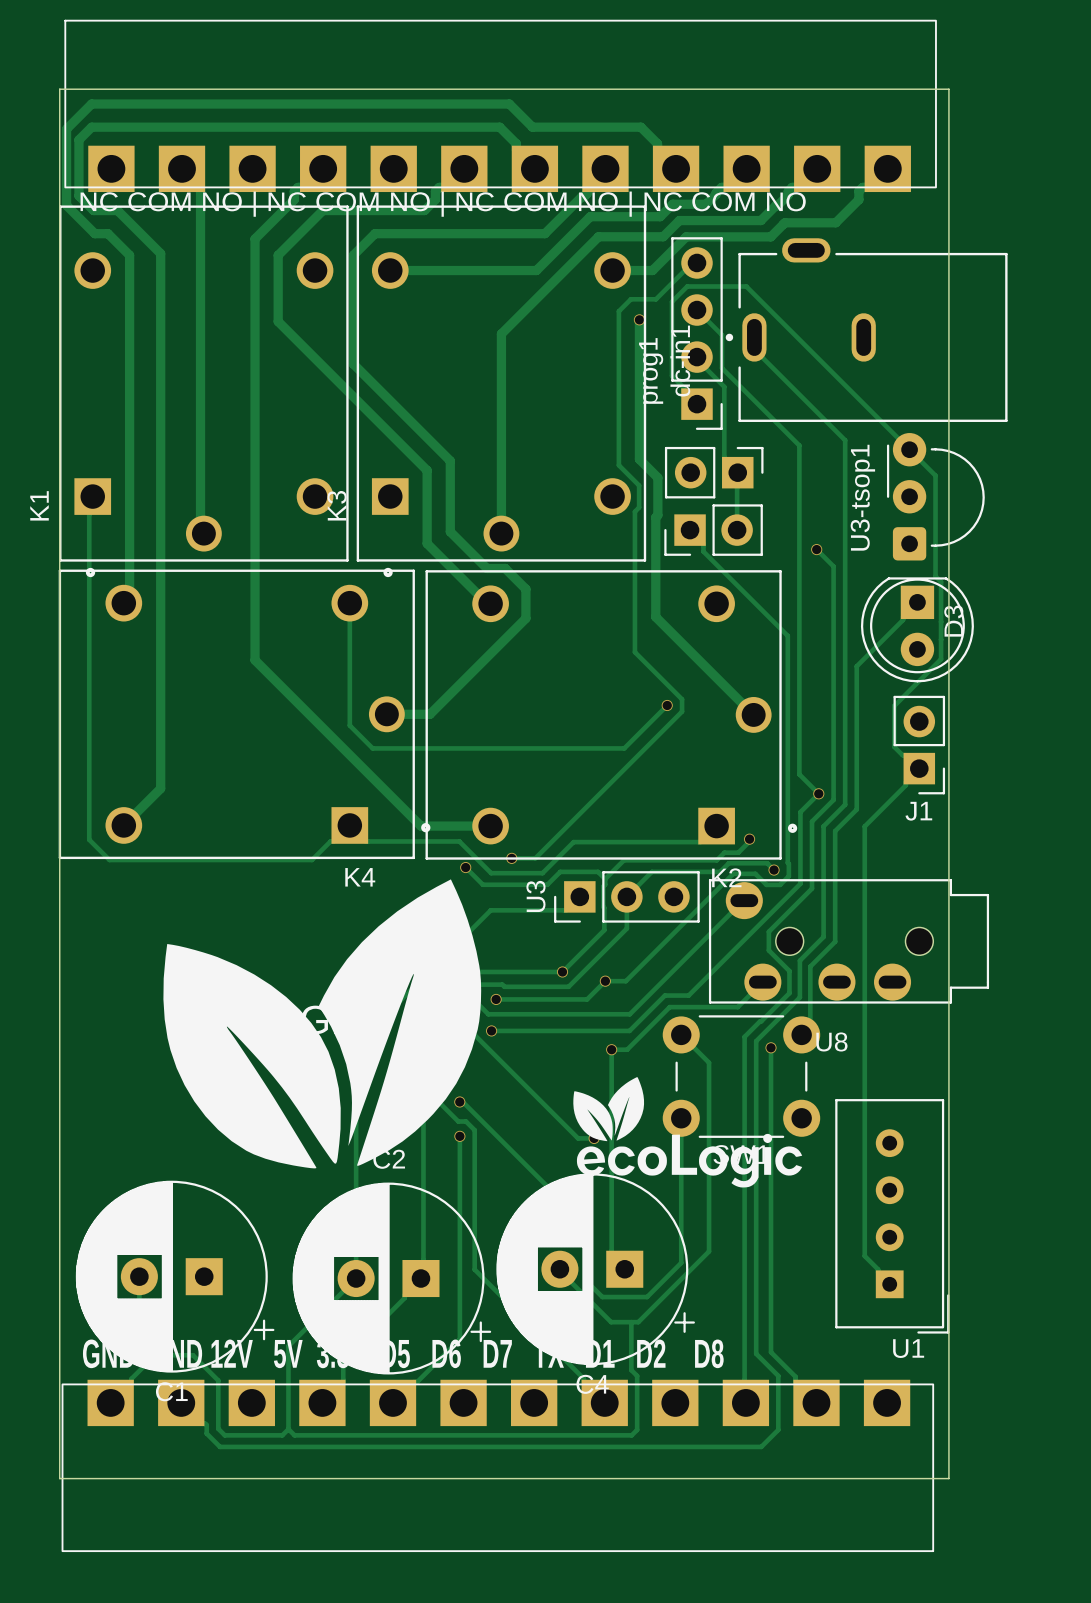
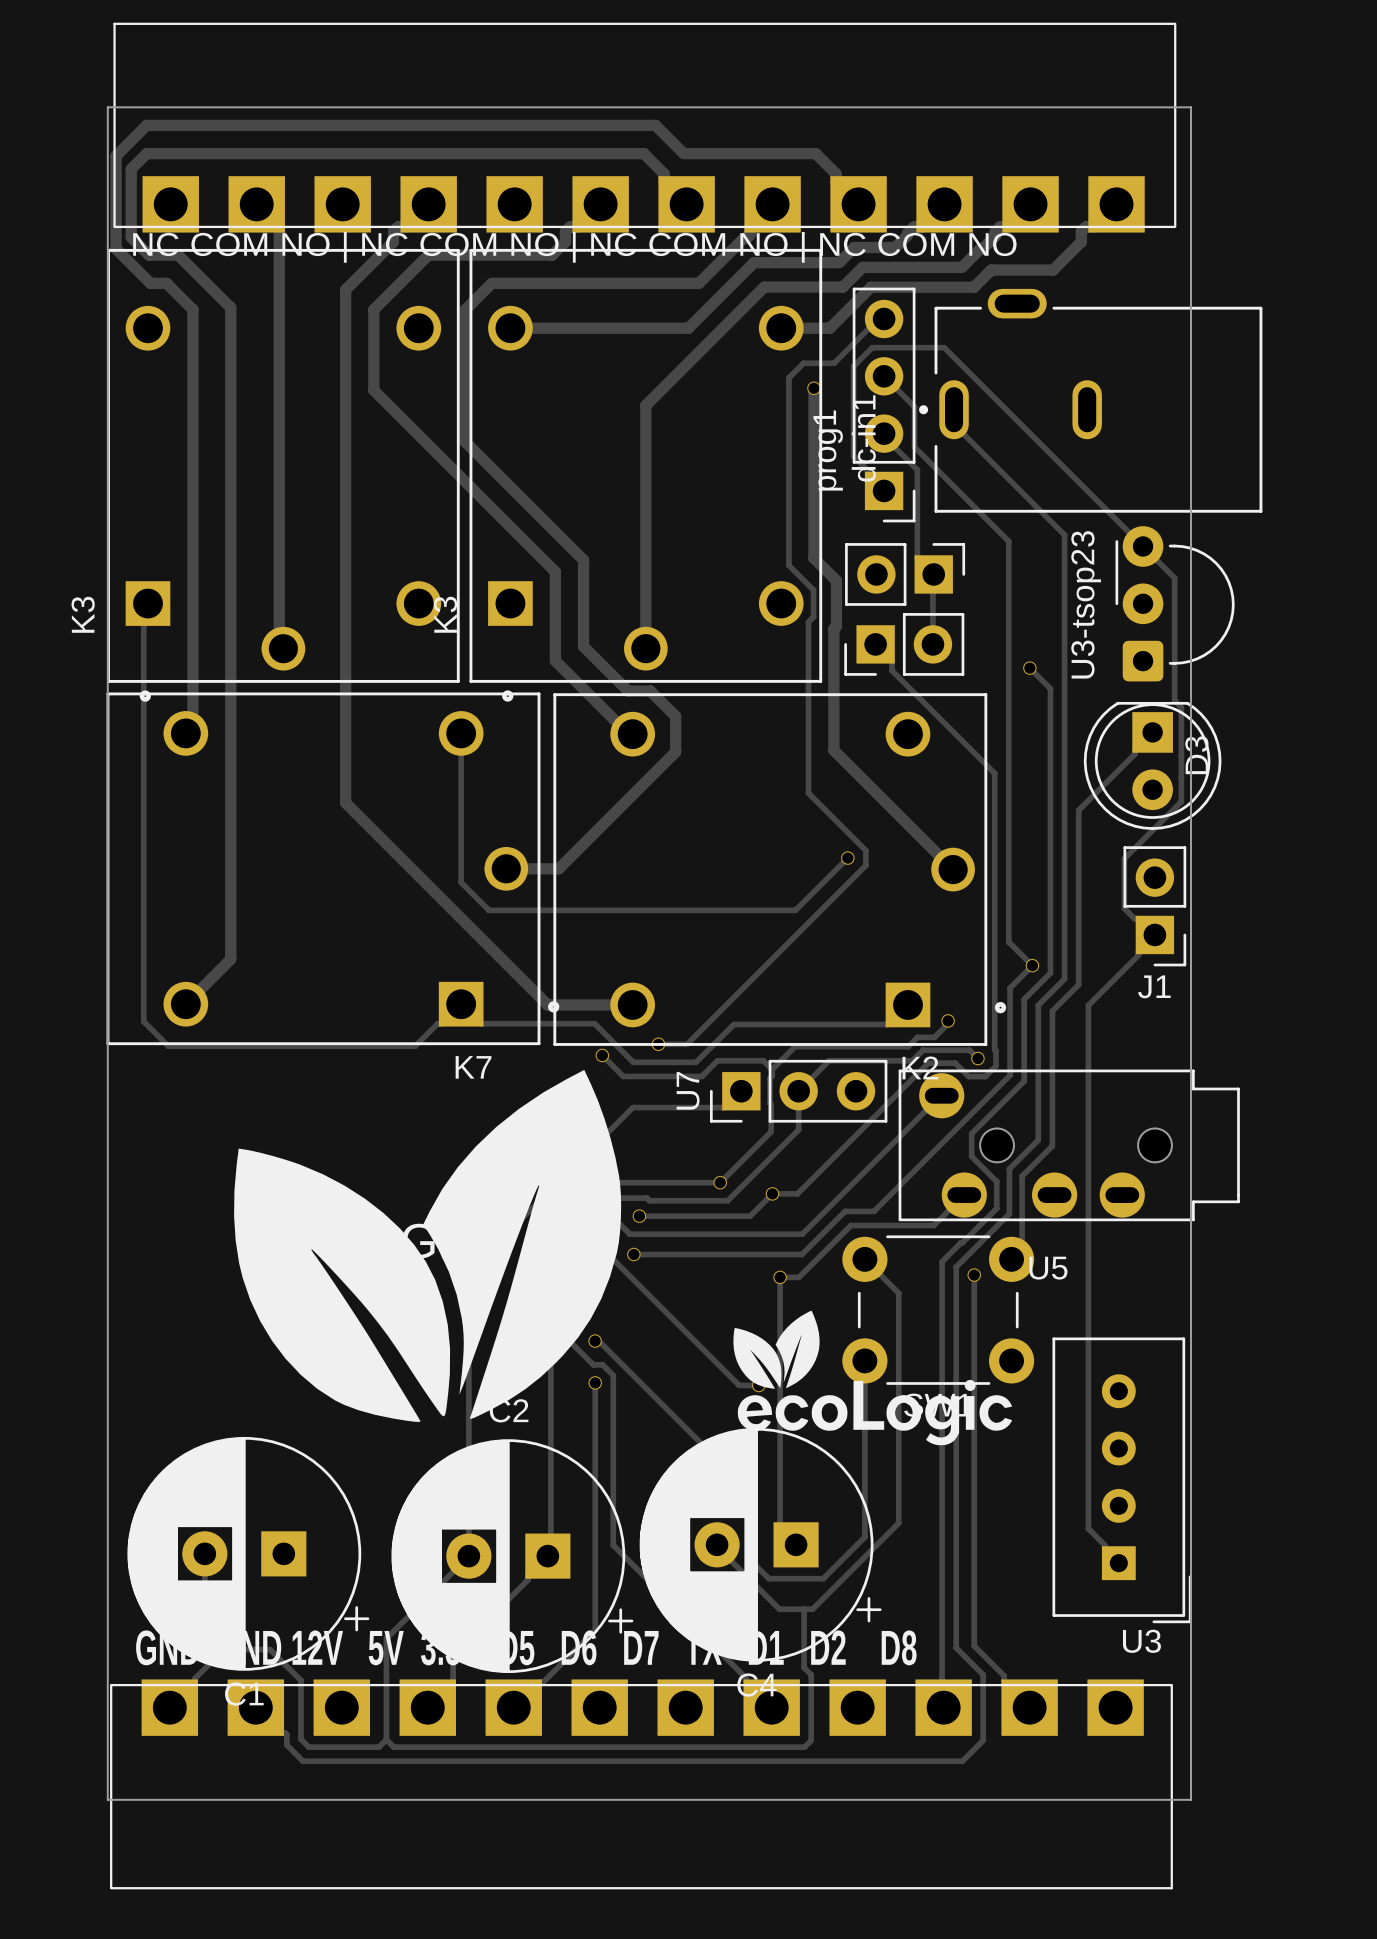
U3-tsop1 name: U3-tsop1 (862, 497) -> U3-tsop23 (1086, 604)
K1 name: K1 (39, 505) -> K3 (83, 614)
K4 name: K4 (360, 877) -> K7 (473, 1067)
U3 name: U3 (535, 896) -> U7 (688, 1090)
U8 name: U8 (831, 1041) -> U5 (1048, 1268)
U1 name: U1 (908, 1348) -> U3 (1141, 1641)

